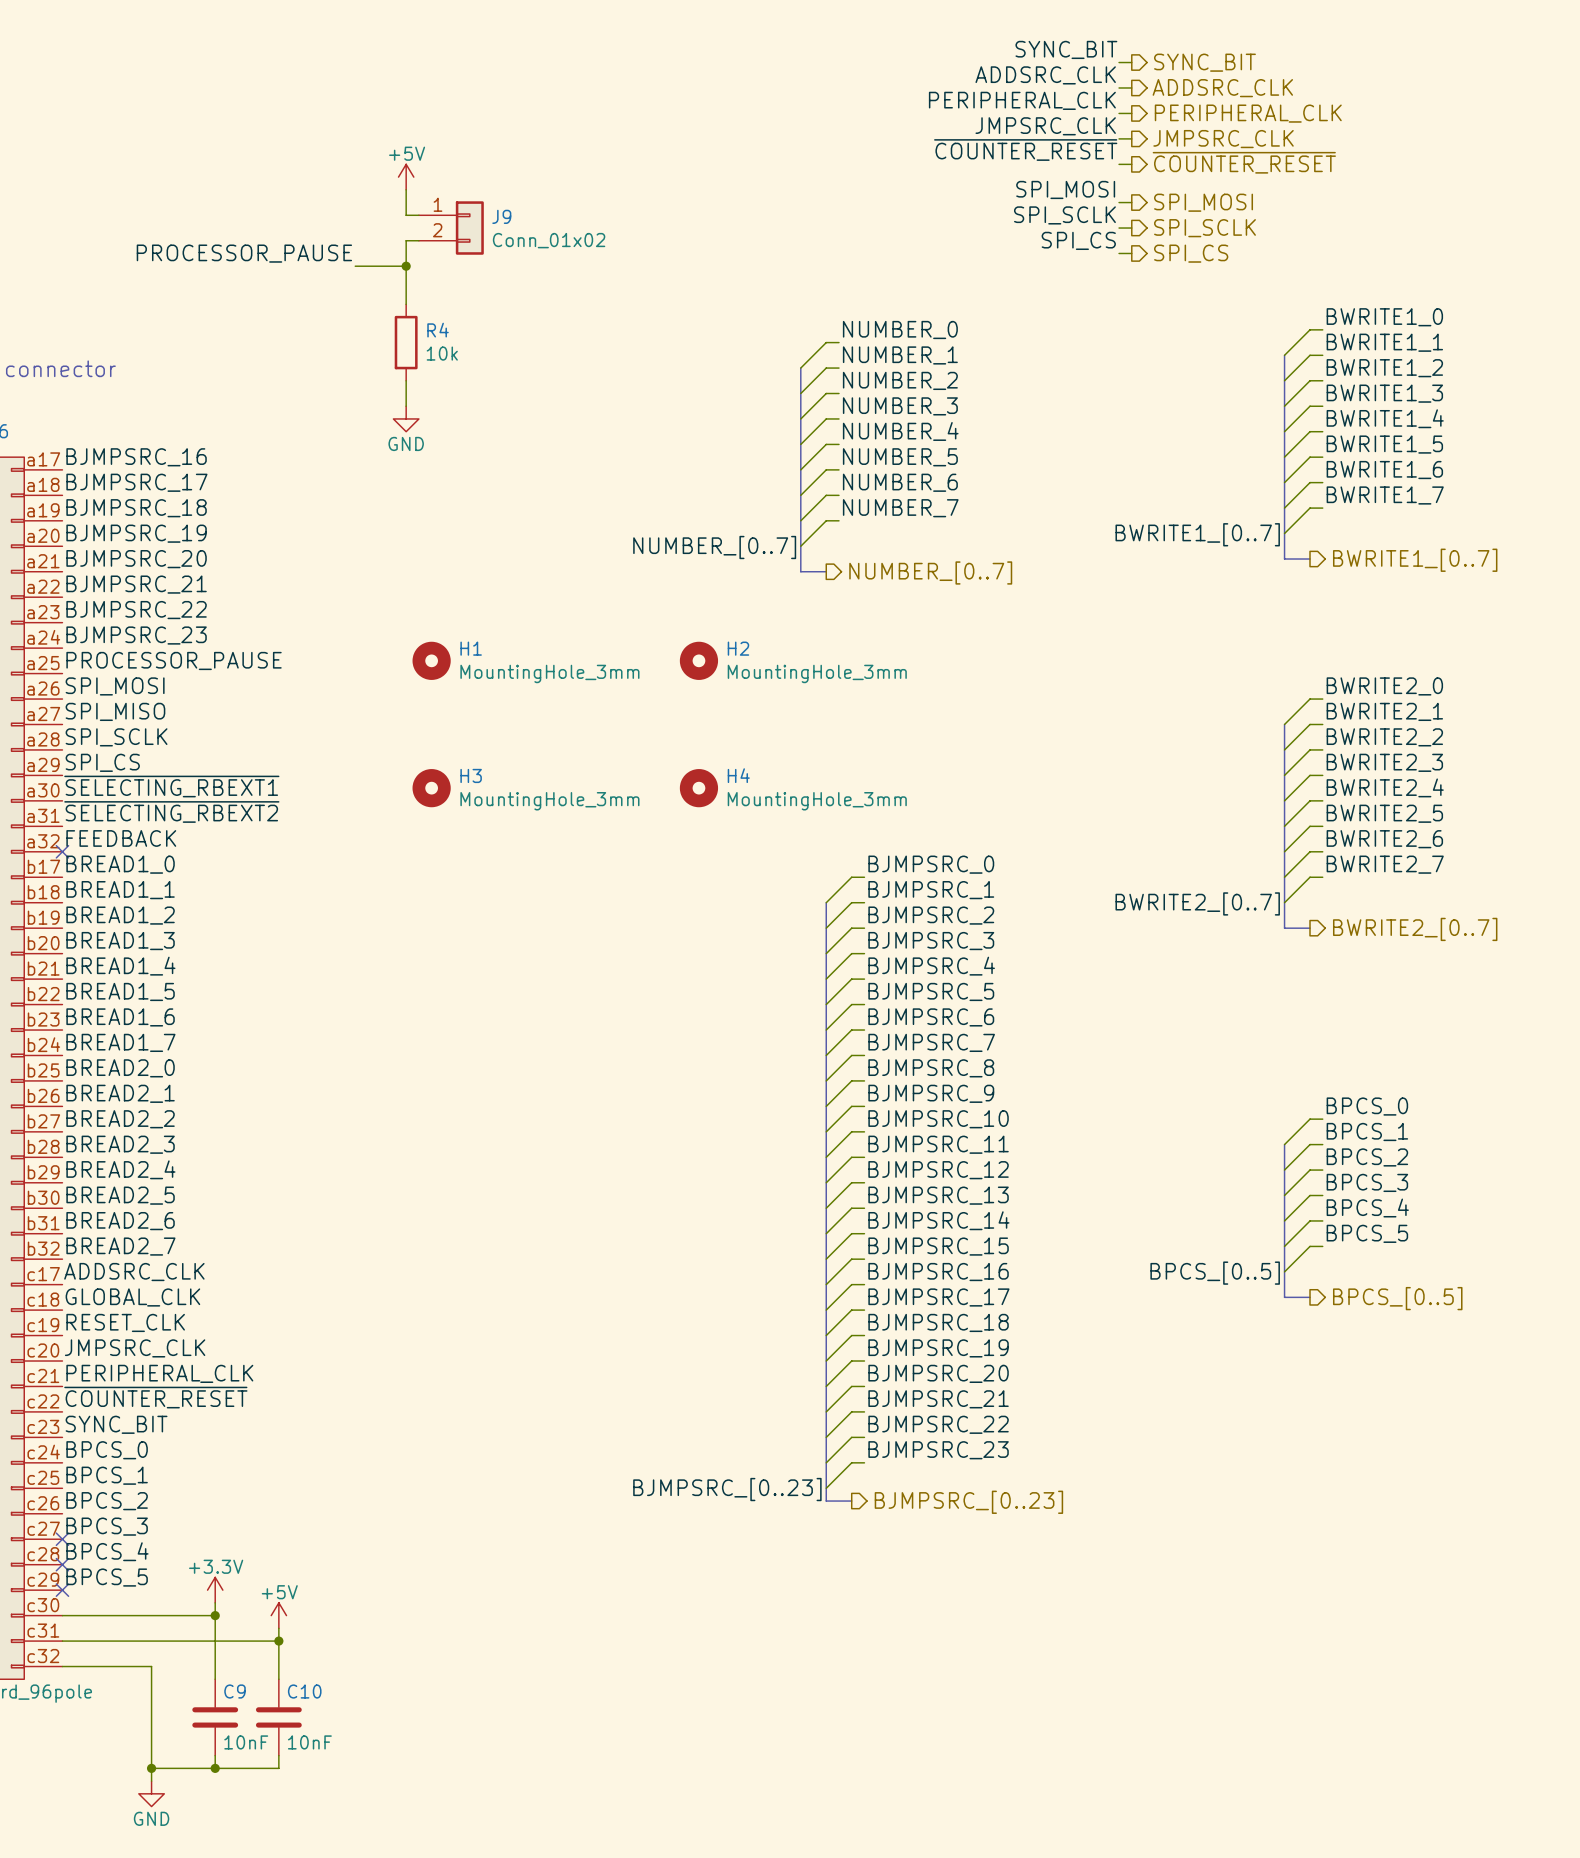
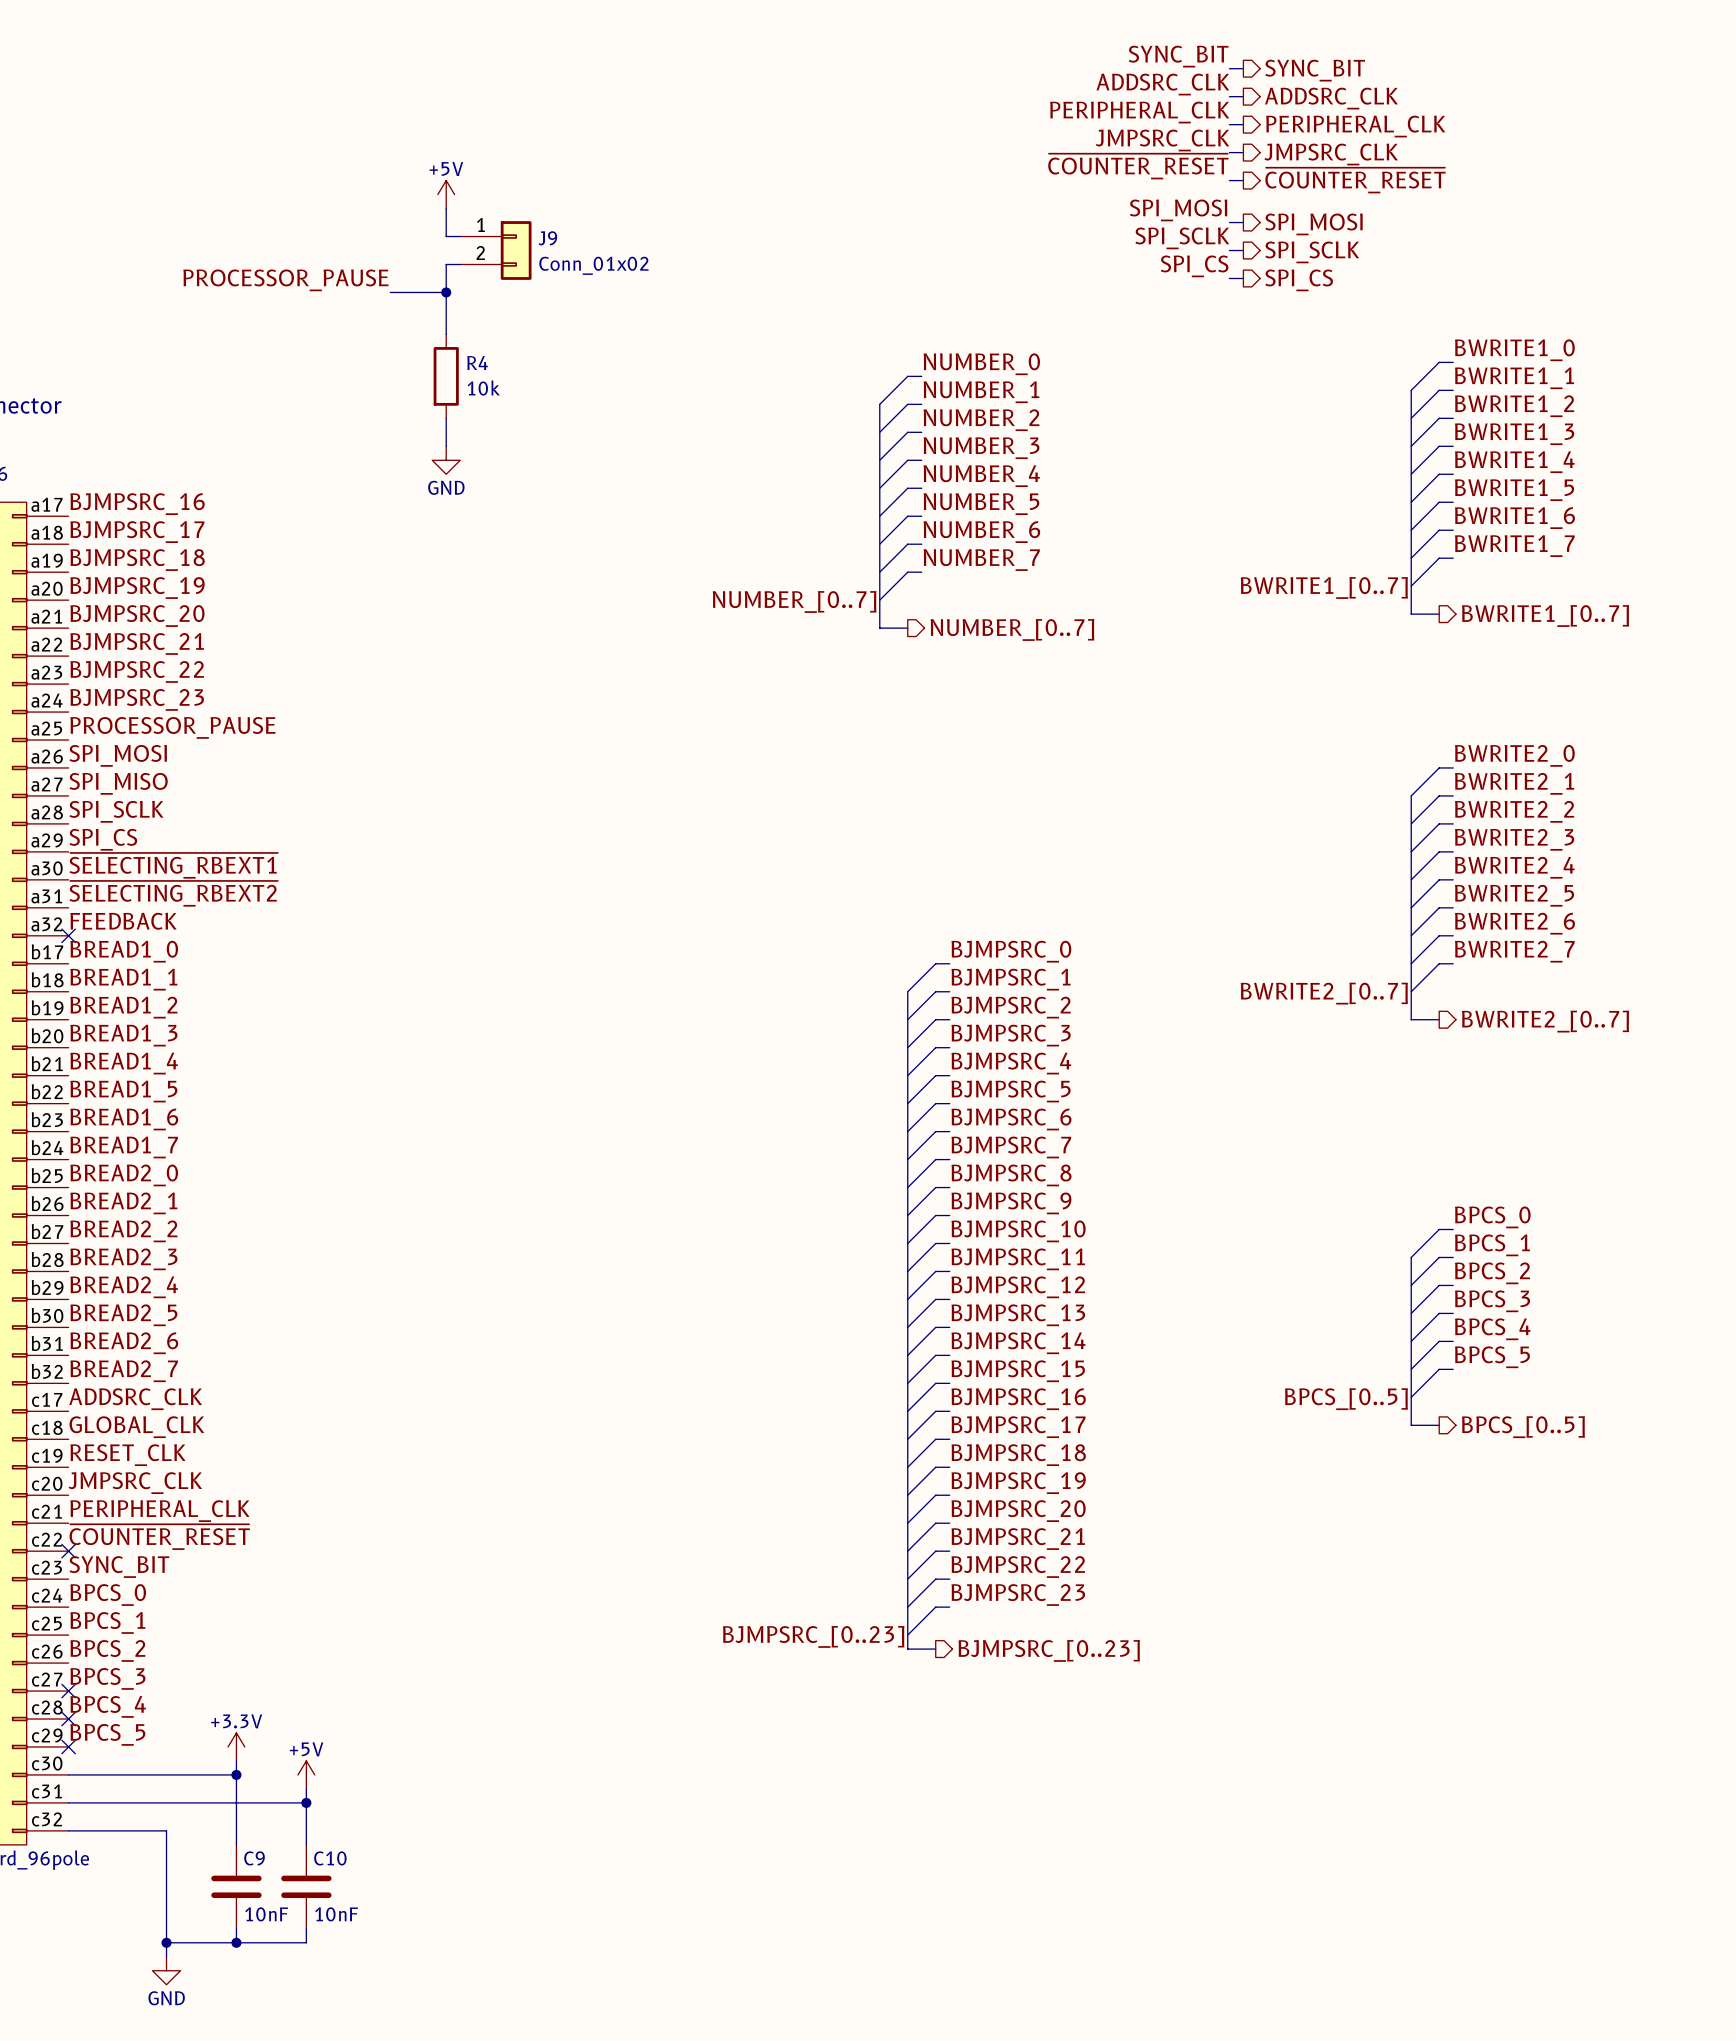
H1: MountingHole_3mm (431, 660) -> none
H2: MountingHole_3mm (698, 660) -> none
H3: MountingHole_3mm (431, 788) -> none
H4: MountingHole_3mm (698, 788) -> none
no-connect mark: none -> (68, 1551)

